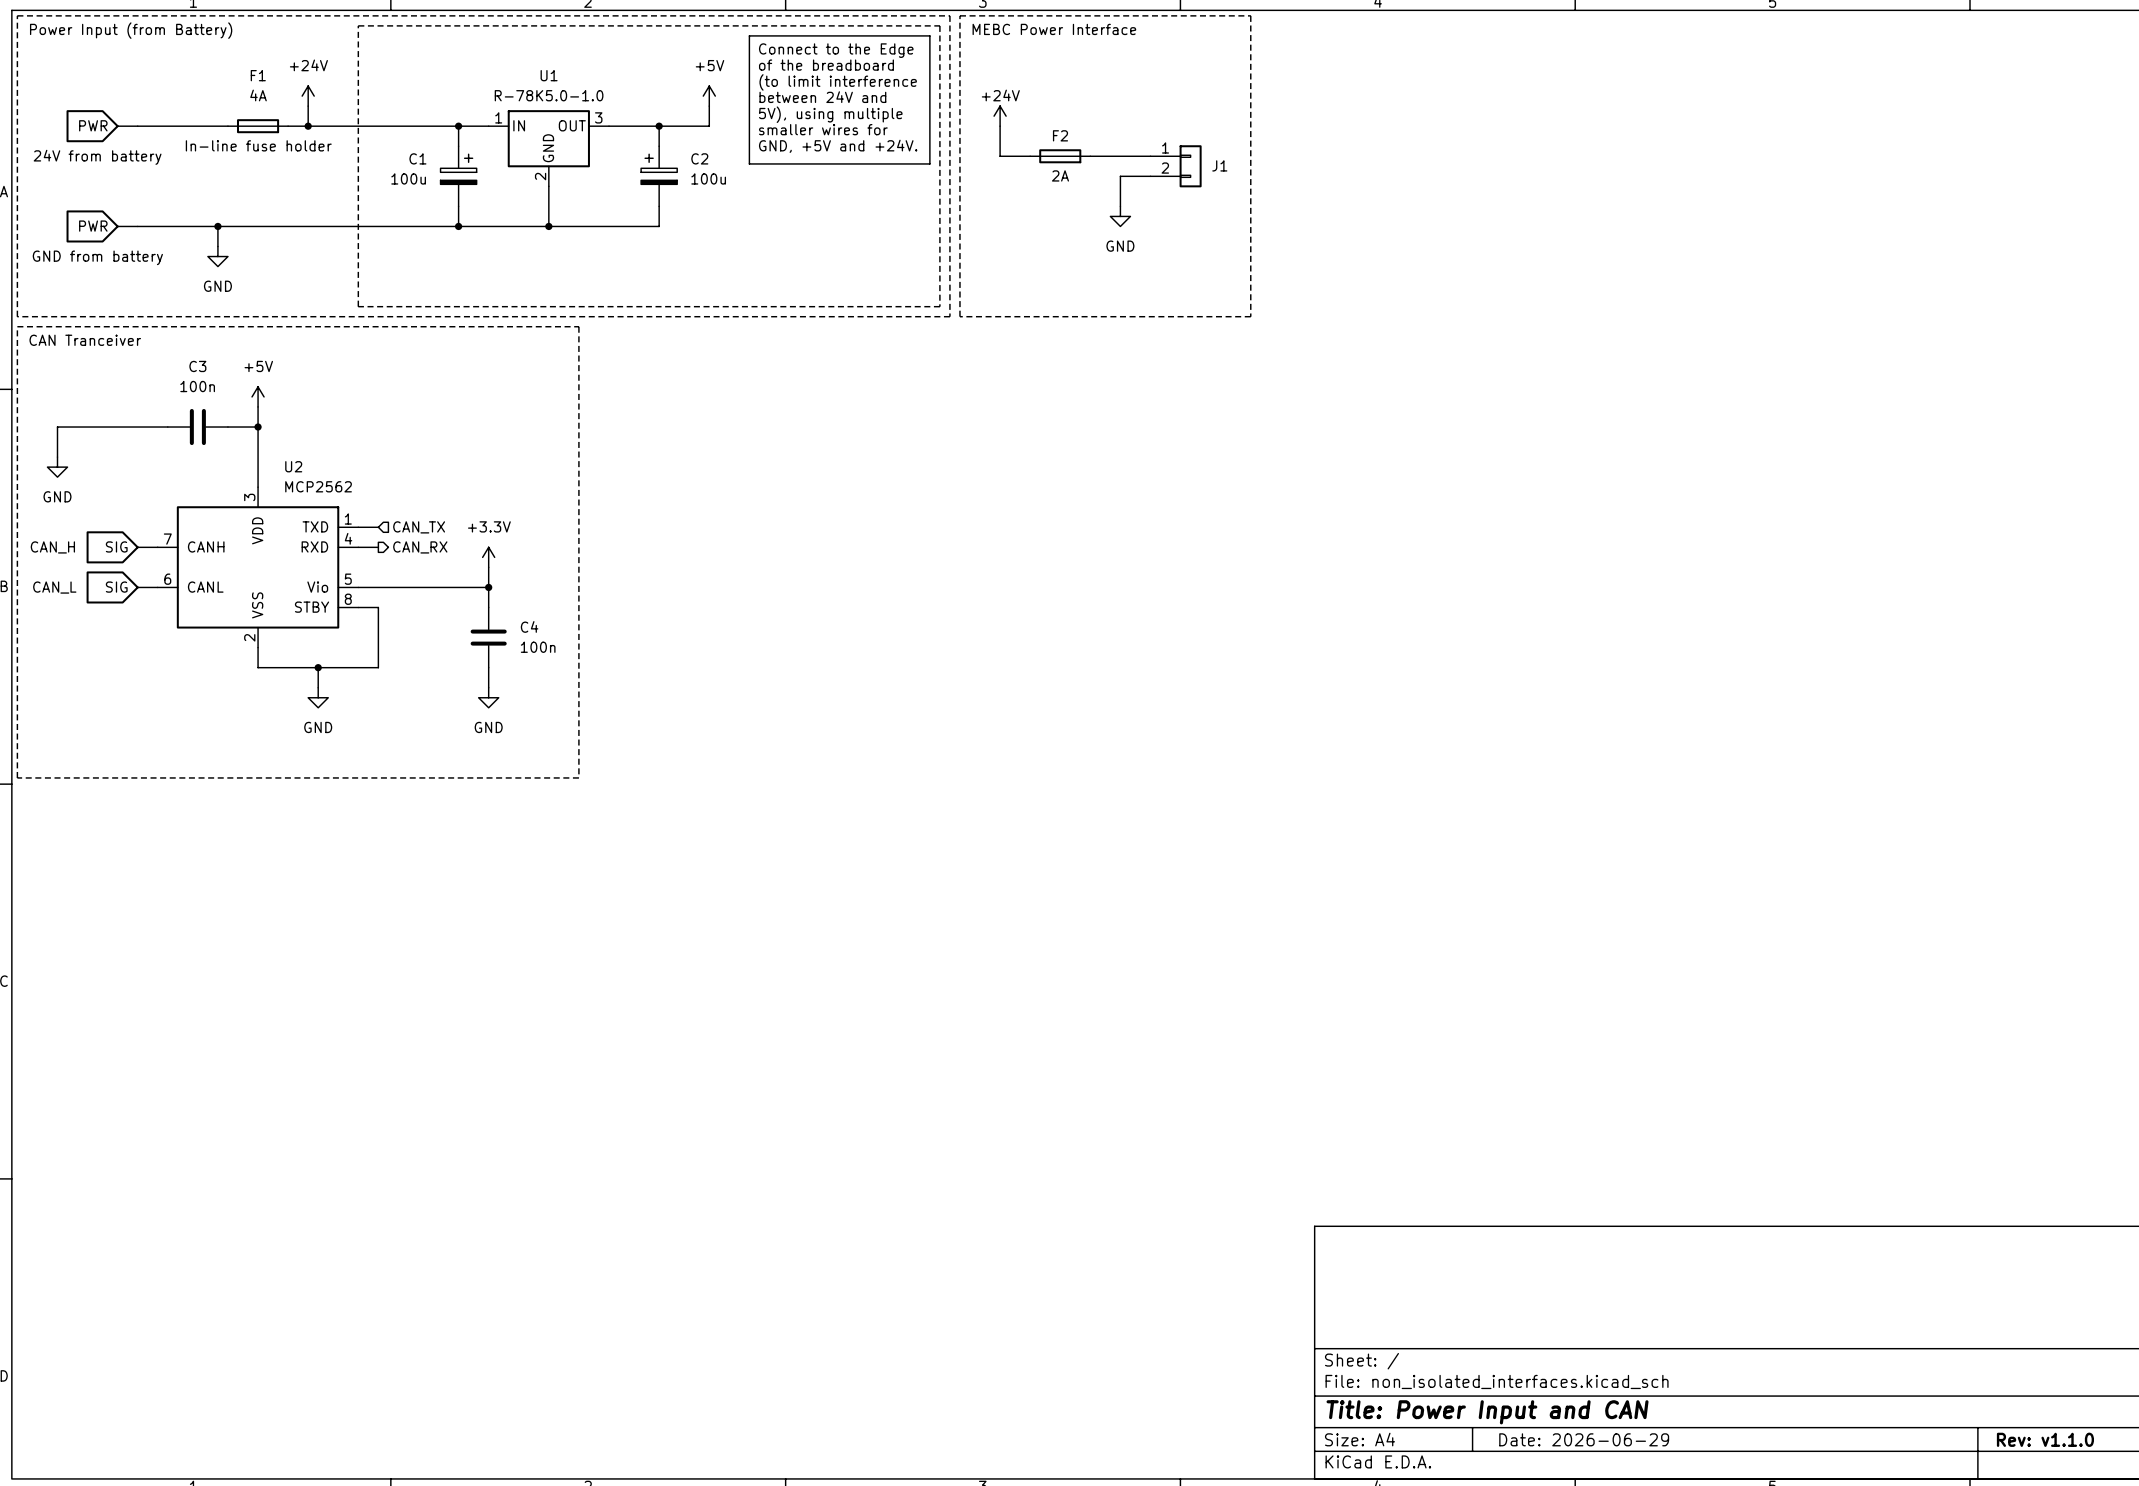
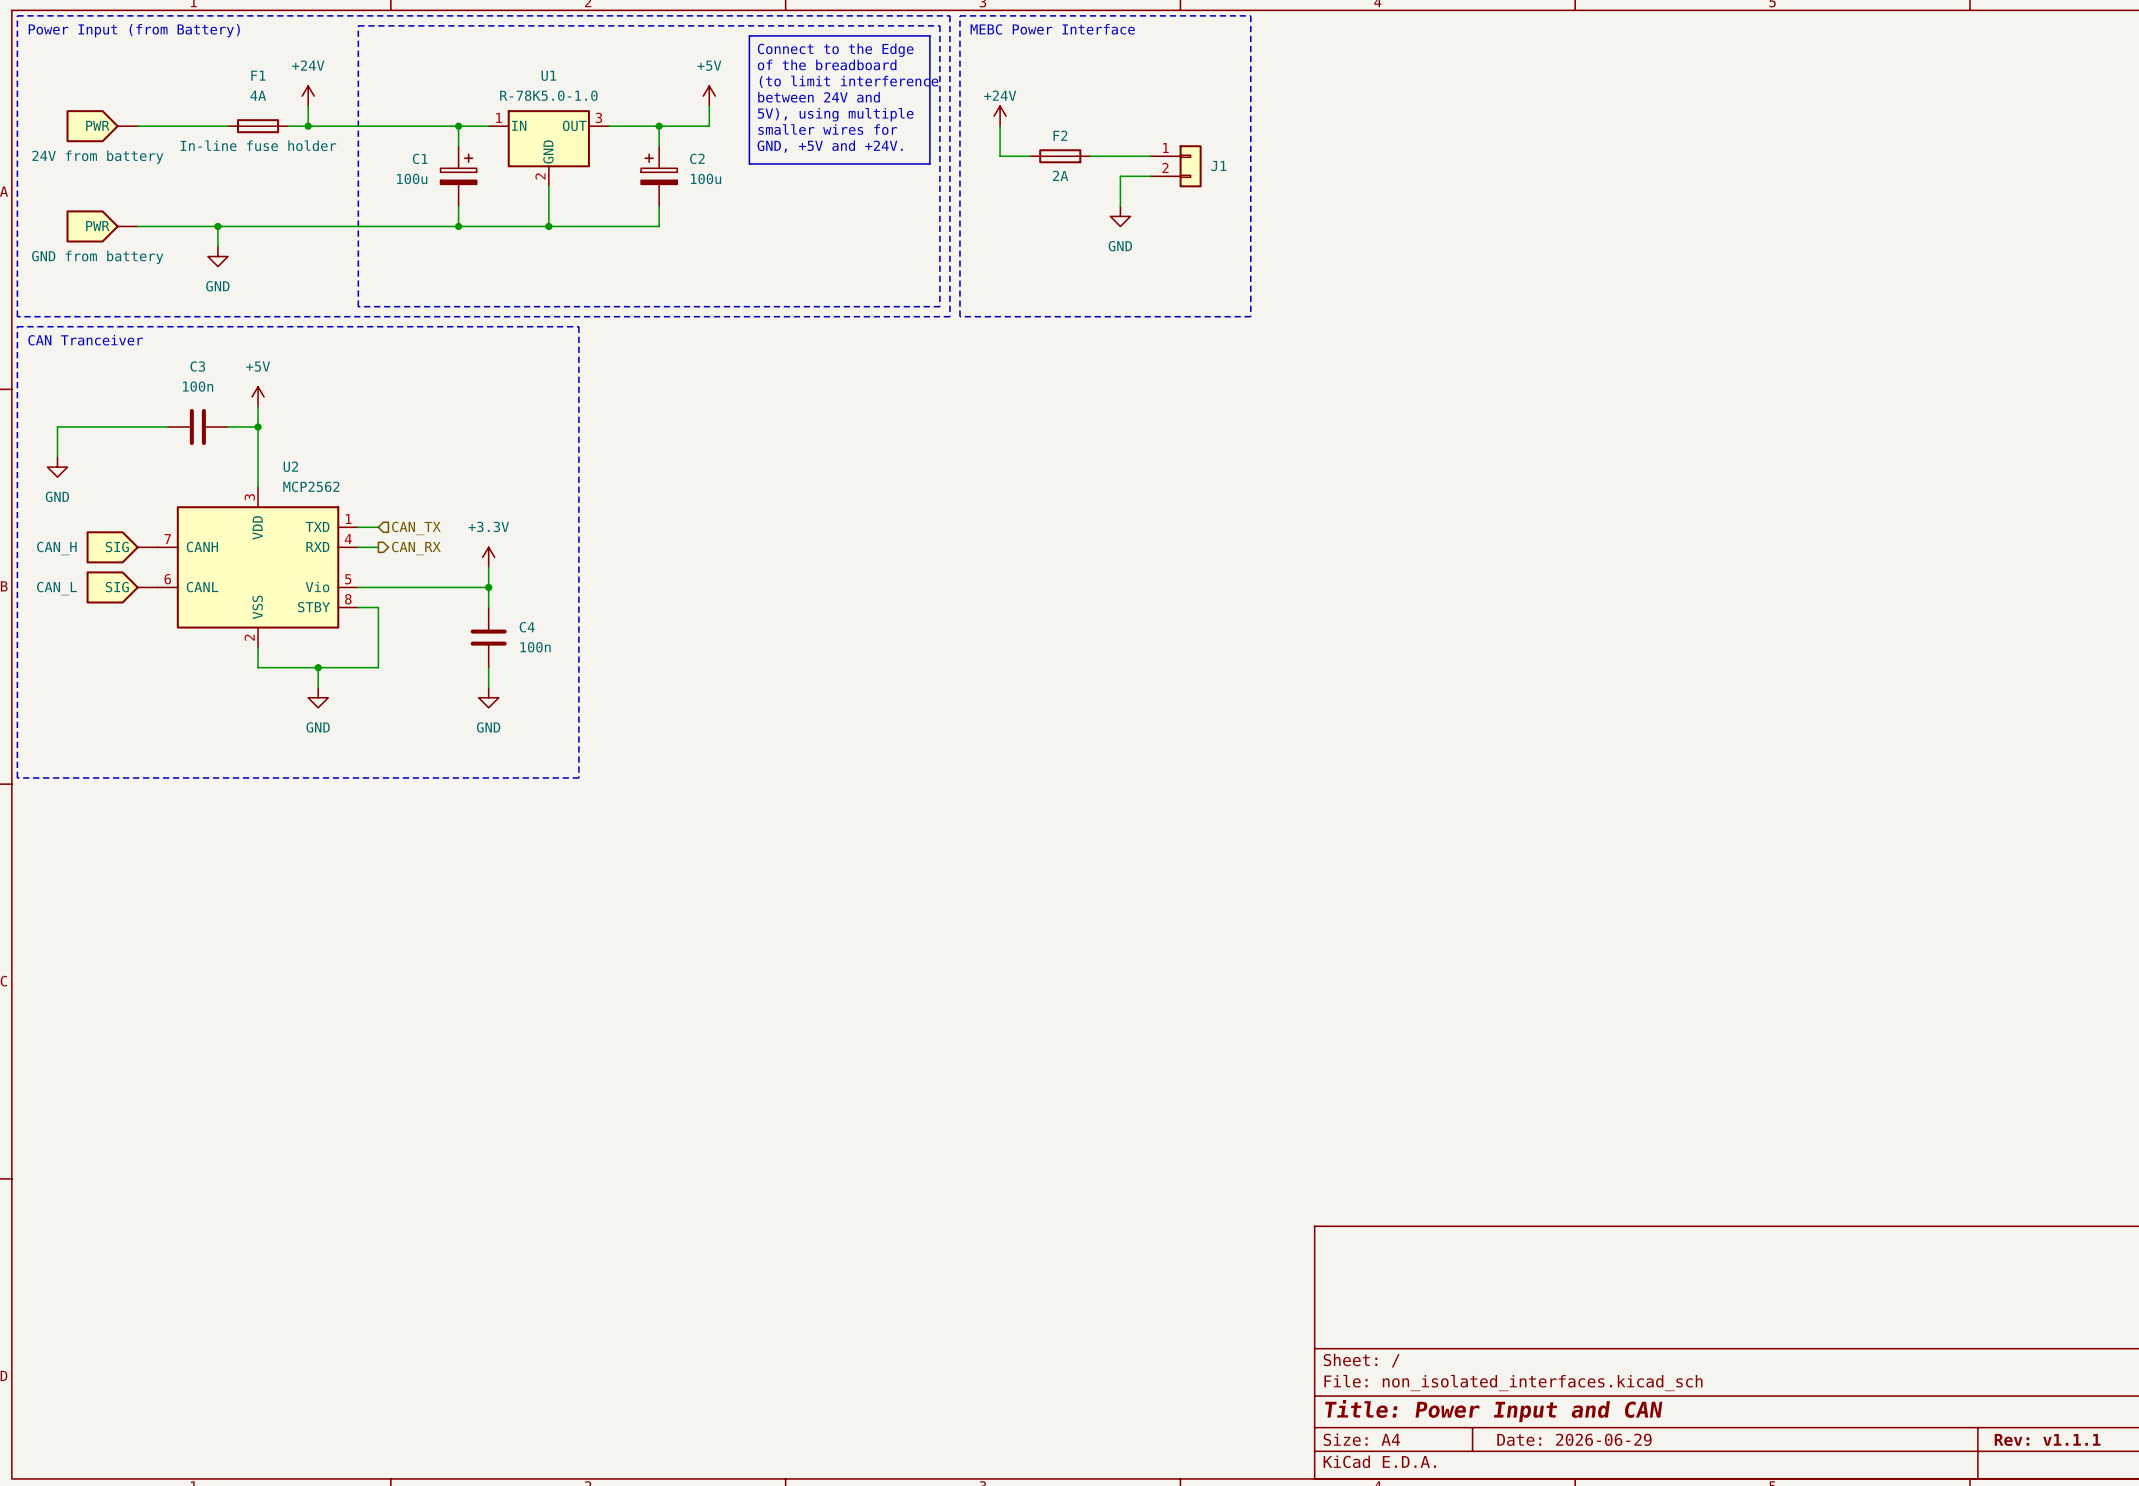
title block: Rev: v1.1.0 (2045, 1439) -> Rev: v1.1.1 (2047, 1439)

